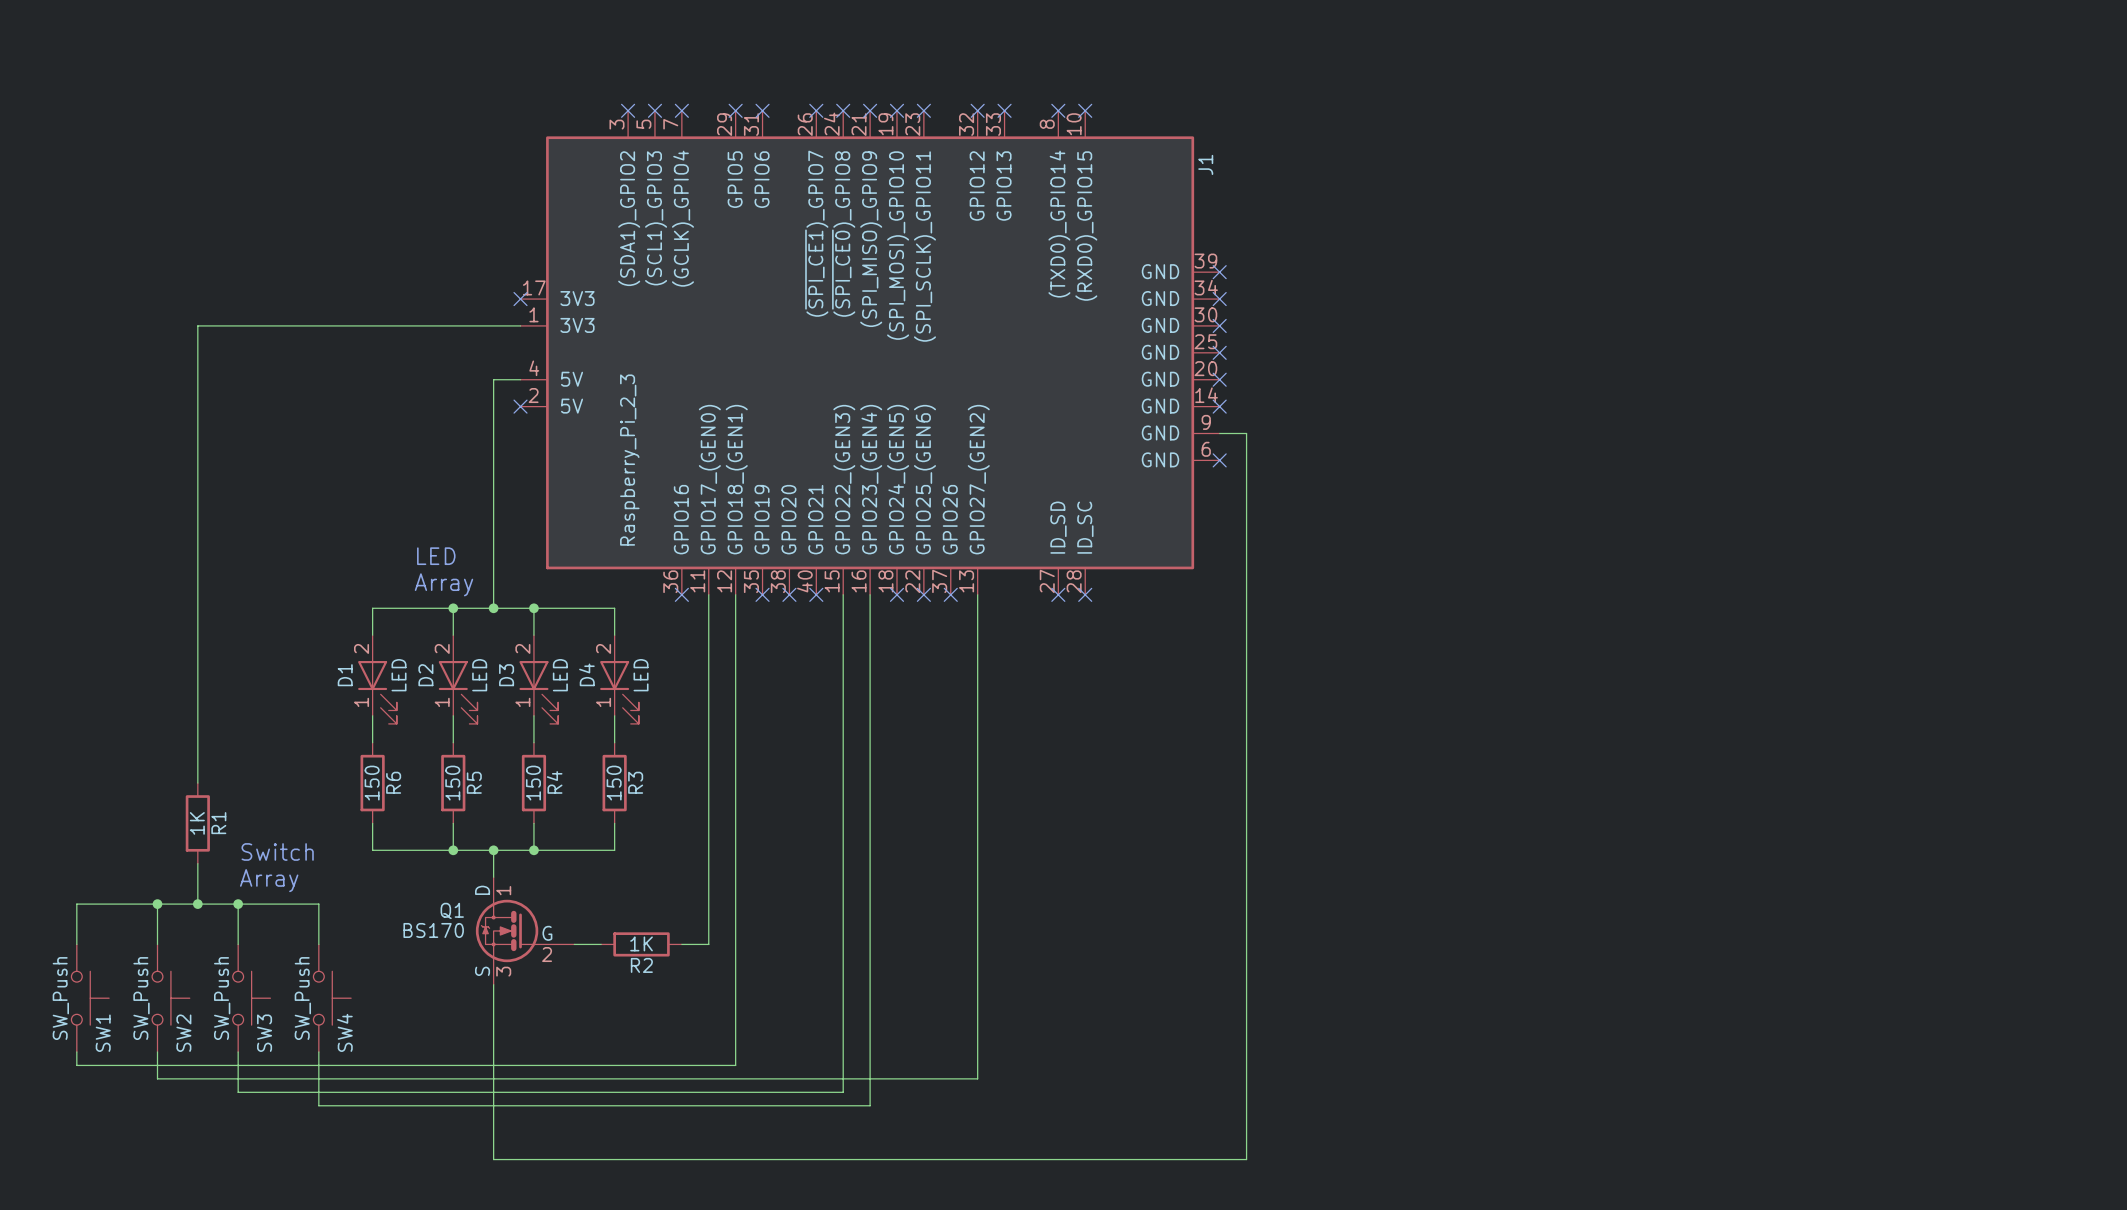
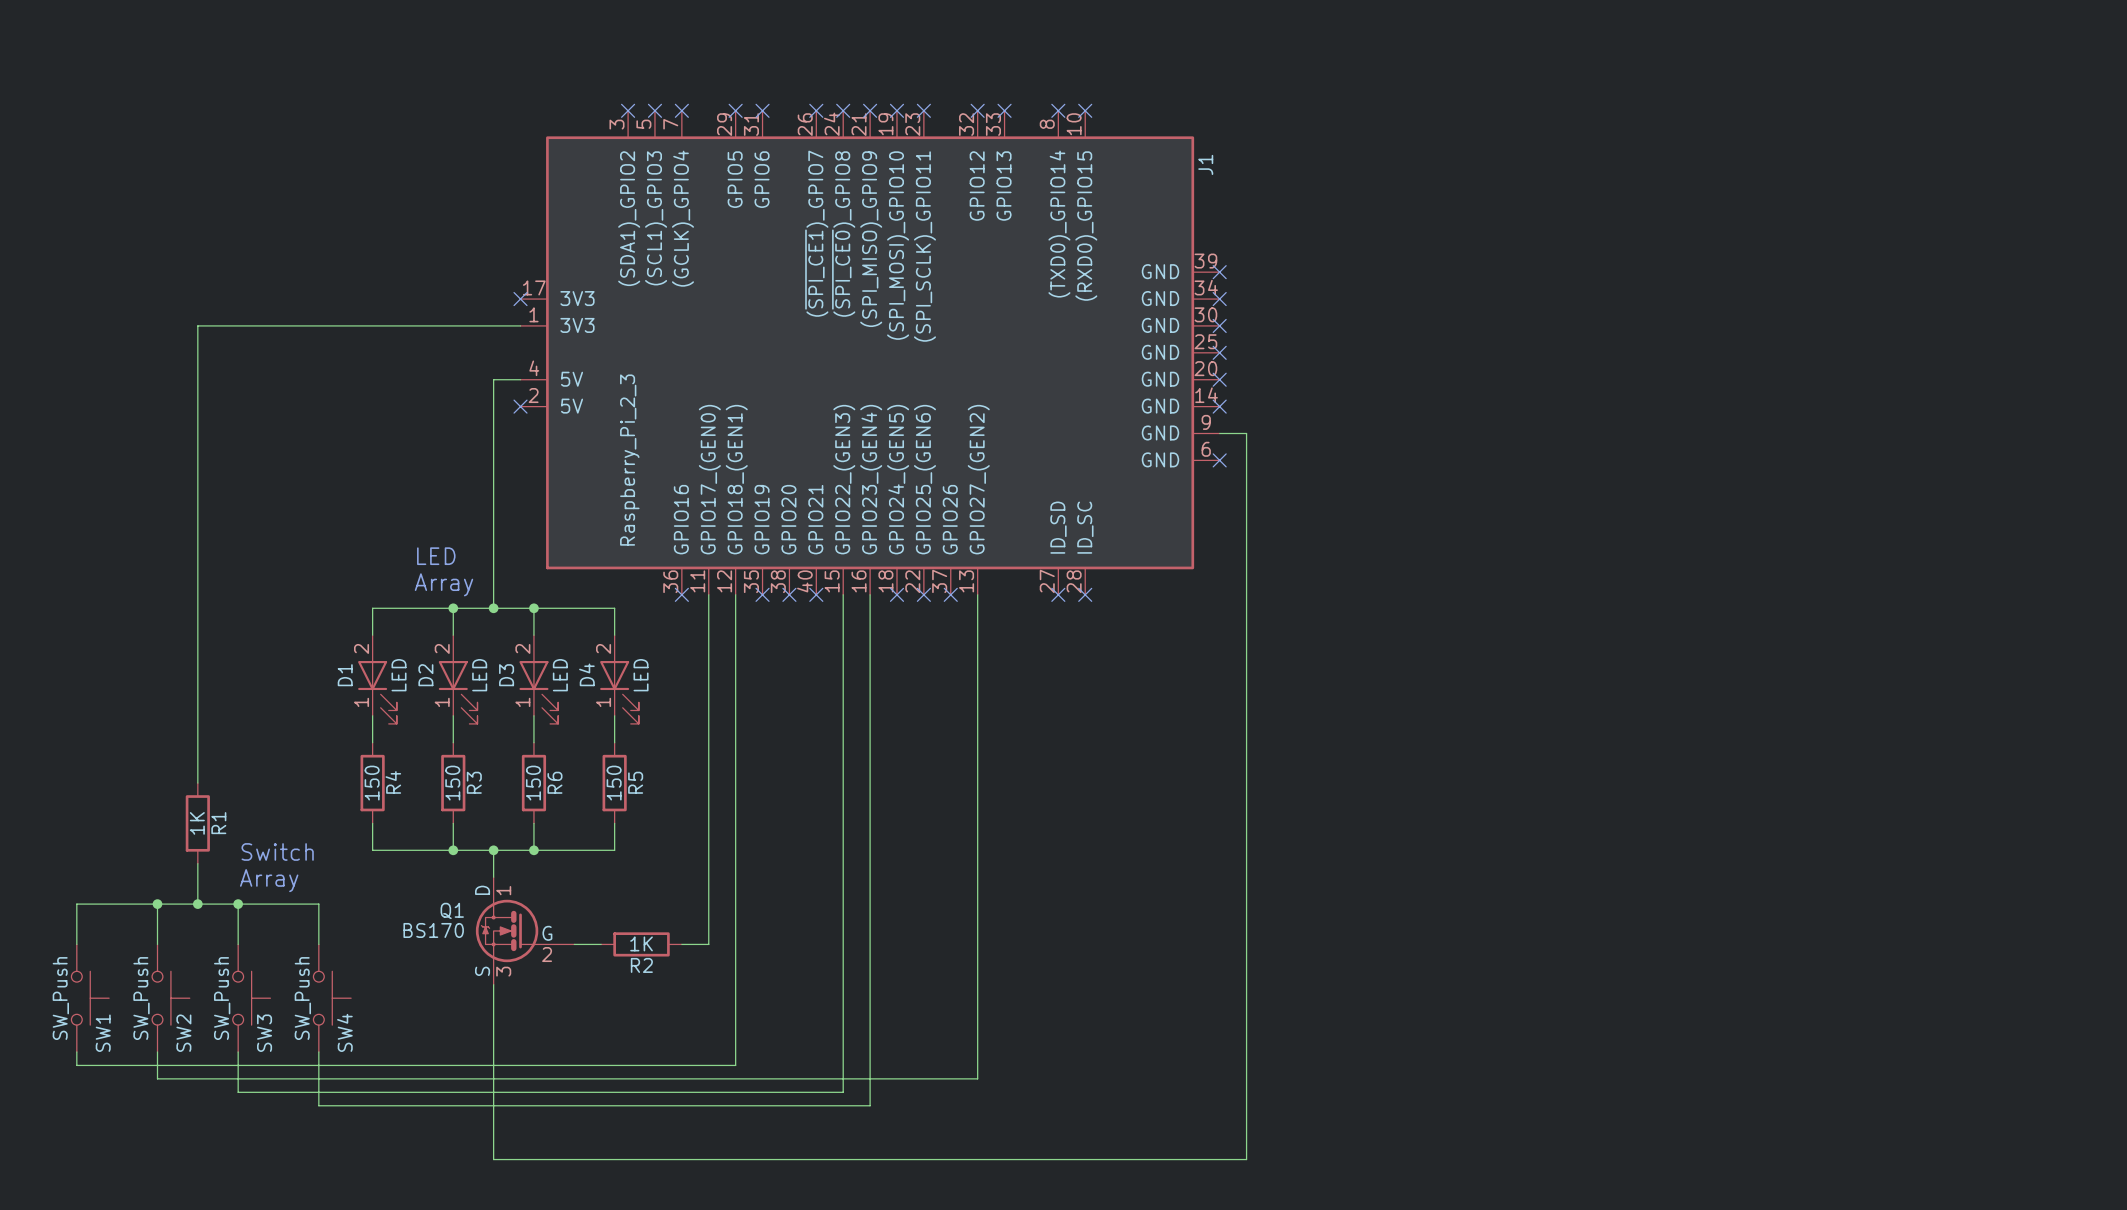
R6 name: R6 (393, 782) -> R4 (393, 782)
R5 name: R5 (474, 782) -> R3 (474, 782)
R4 name: R4 (554, 782) -> R6 (554, 782)
R3 name: R3 (635, 782) -> R5 (635, 782)

